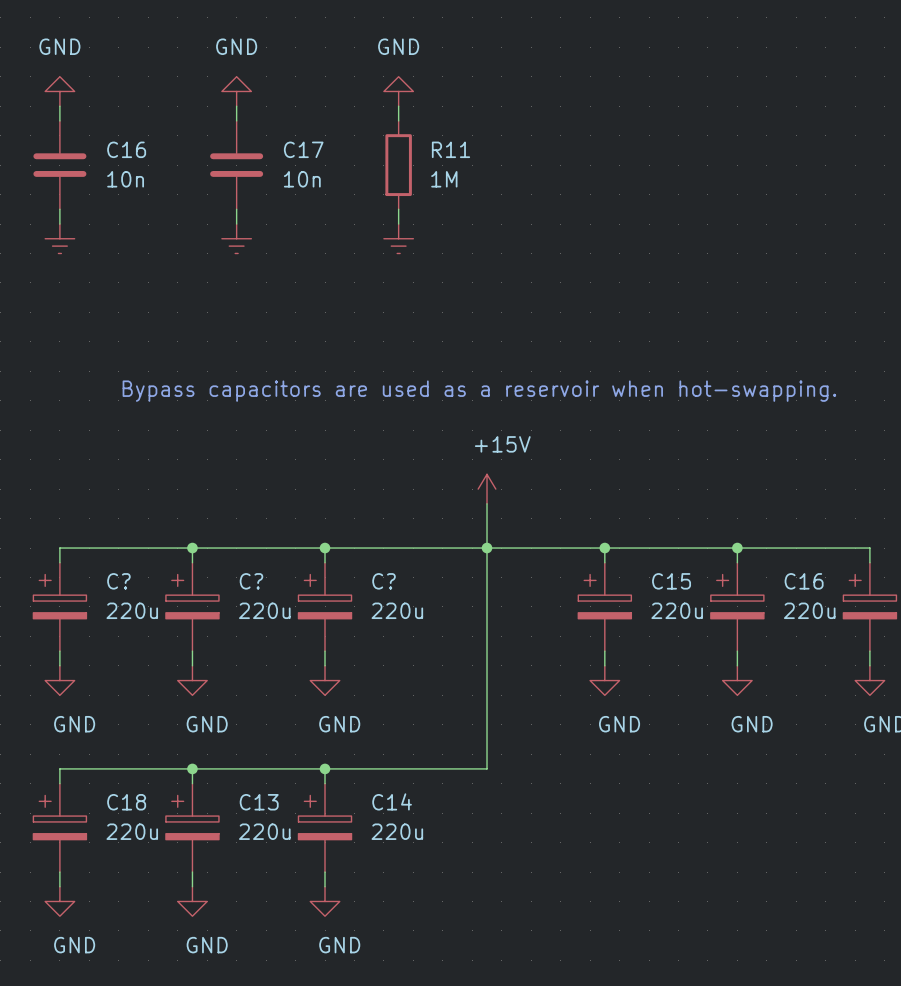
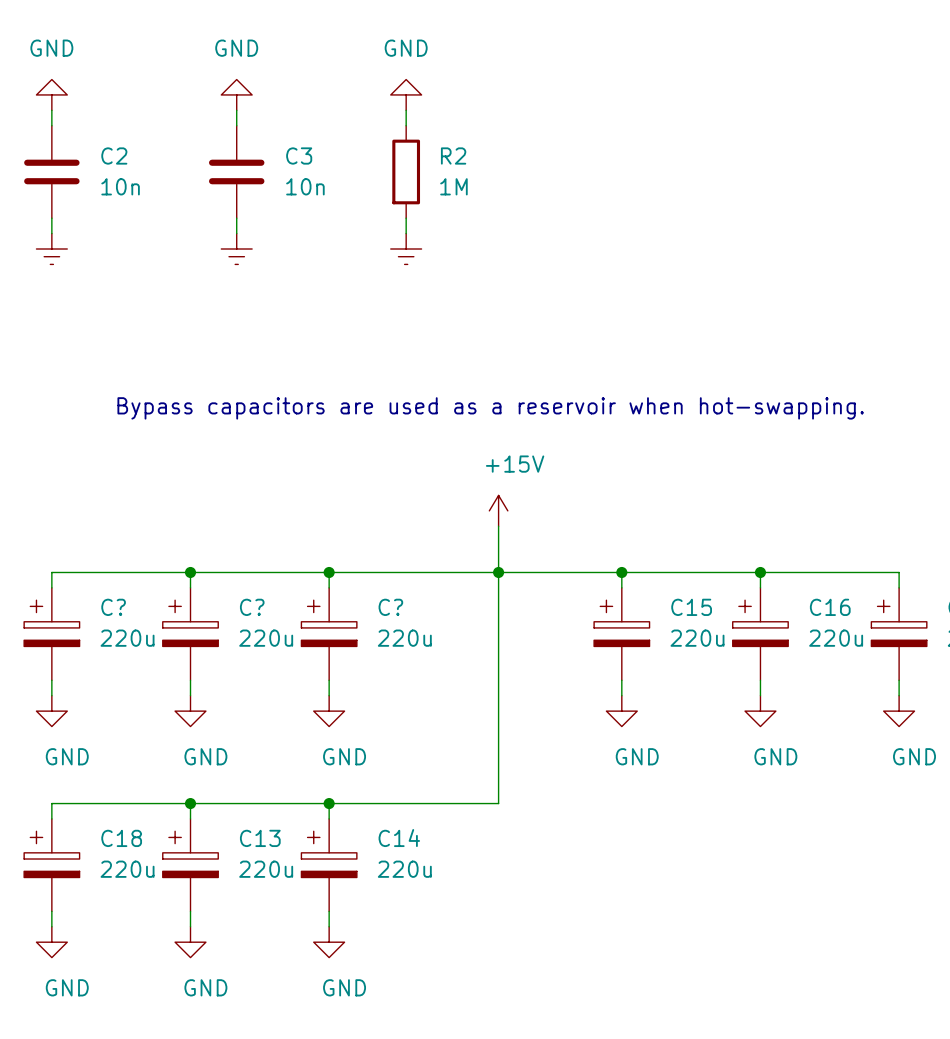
C16 name: C16 (126, 149) -> C2 (114, 156)
C17 name: C17 (303, 149) -> C3 (299, 156)
R11 name: R11 (451, 149) -> R2 (453, 156)

